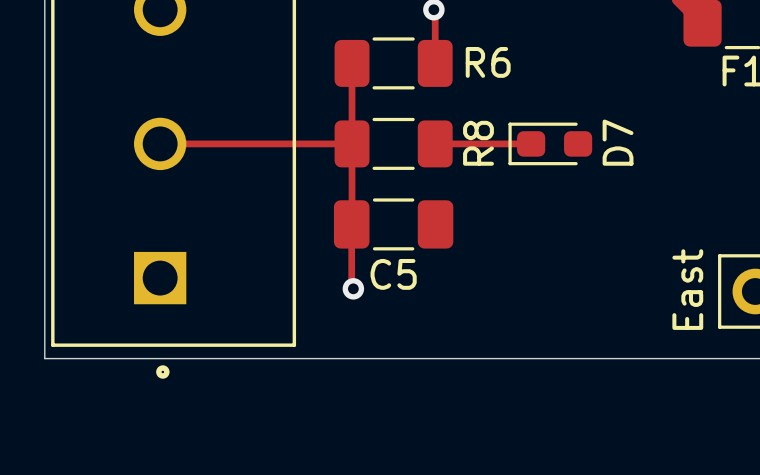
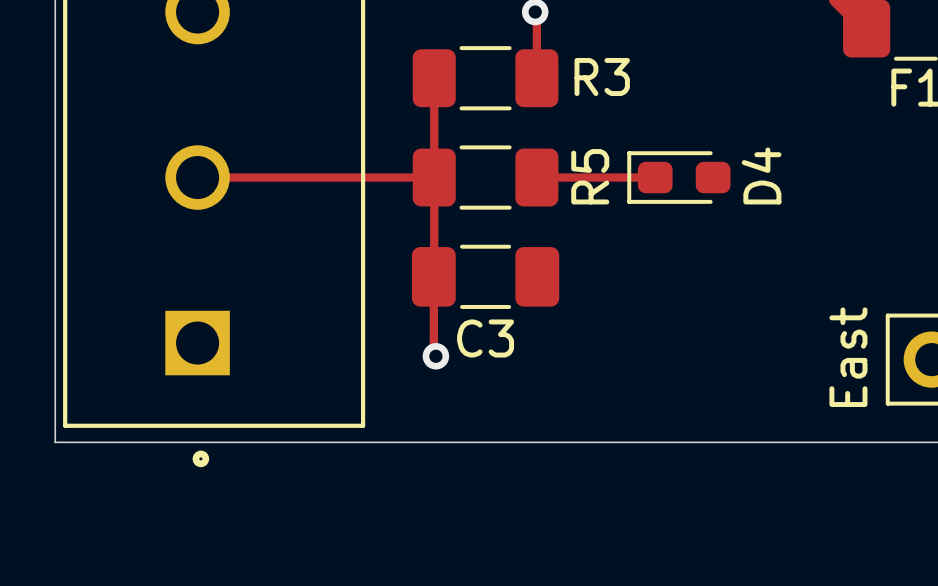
R6 name: R6 (488, 62) -> R3 (602, 76)
D7 name: D7 (618, 142) -> D4 (761, 175)
R8 name: R8 (478, 143) -> R5 (590, 176)
C5 name: C5 (393, 274) -> C3 (485, 338)

